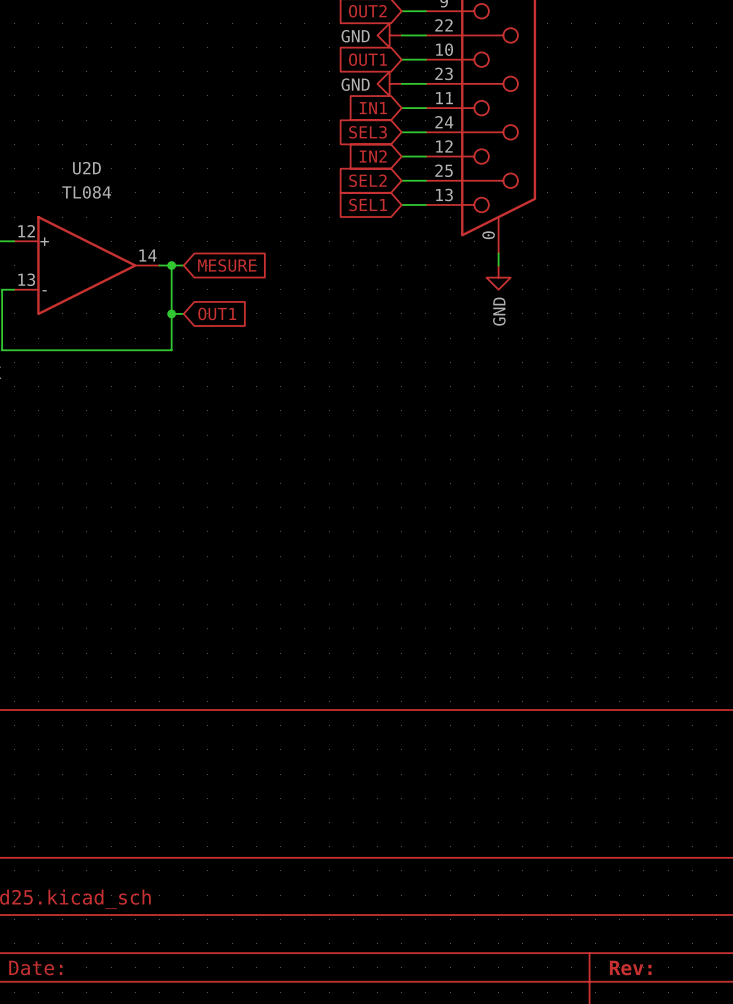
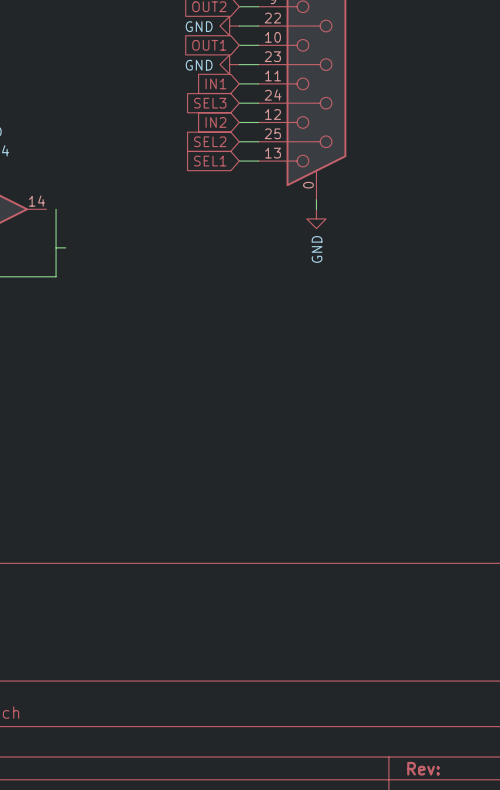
wire: (159, 265) (183, 265) -> none
junction: (171, 265) -> none
global label: MESURE (227, 265) -> none
junction: (171, 313) -> none
global label: OUT1 (217, 313) -> none

